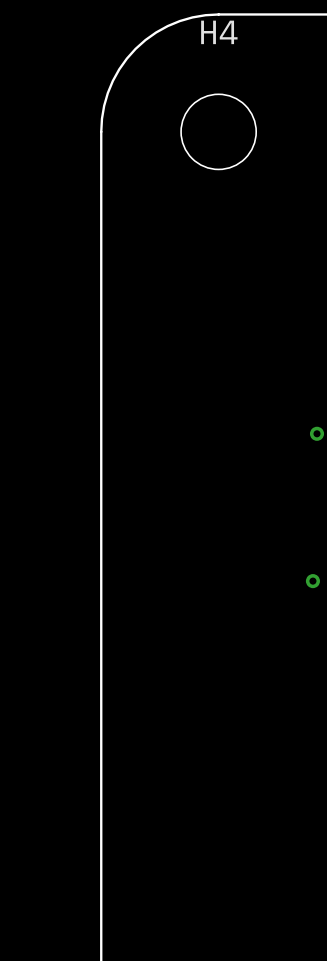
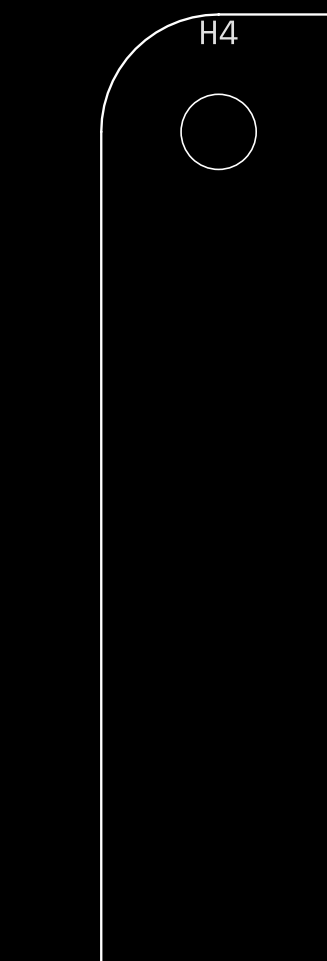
via: (317, 433) -> none
via: (312, 581) -> none

